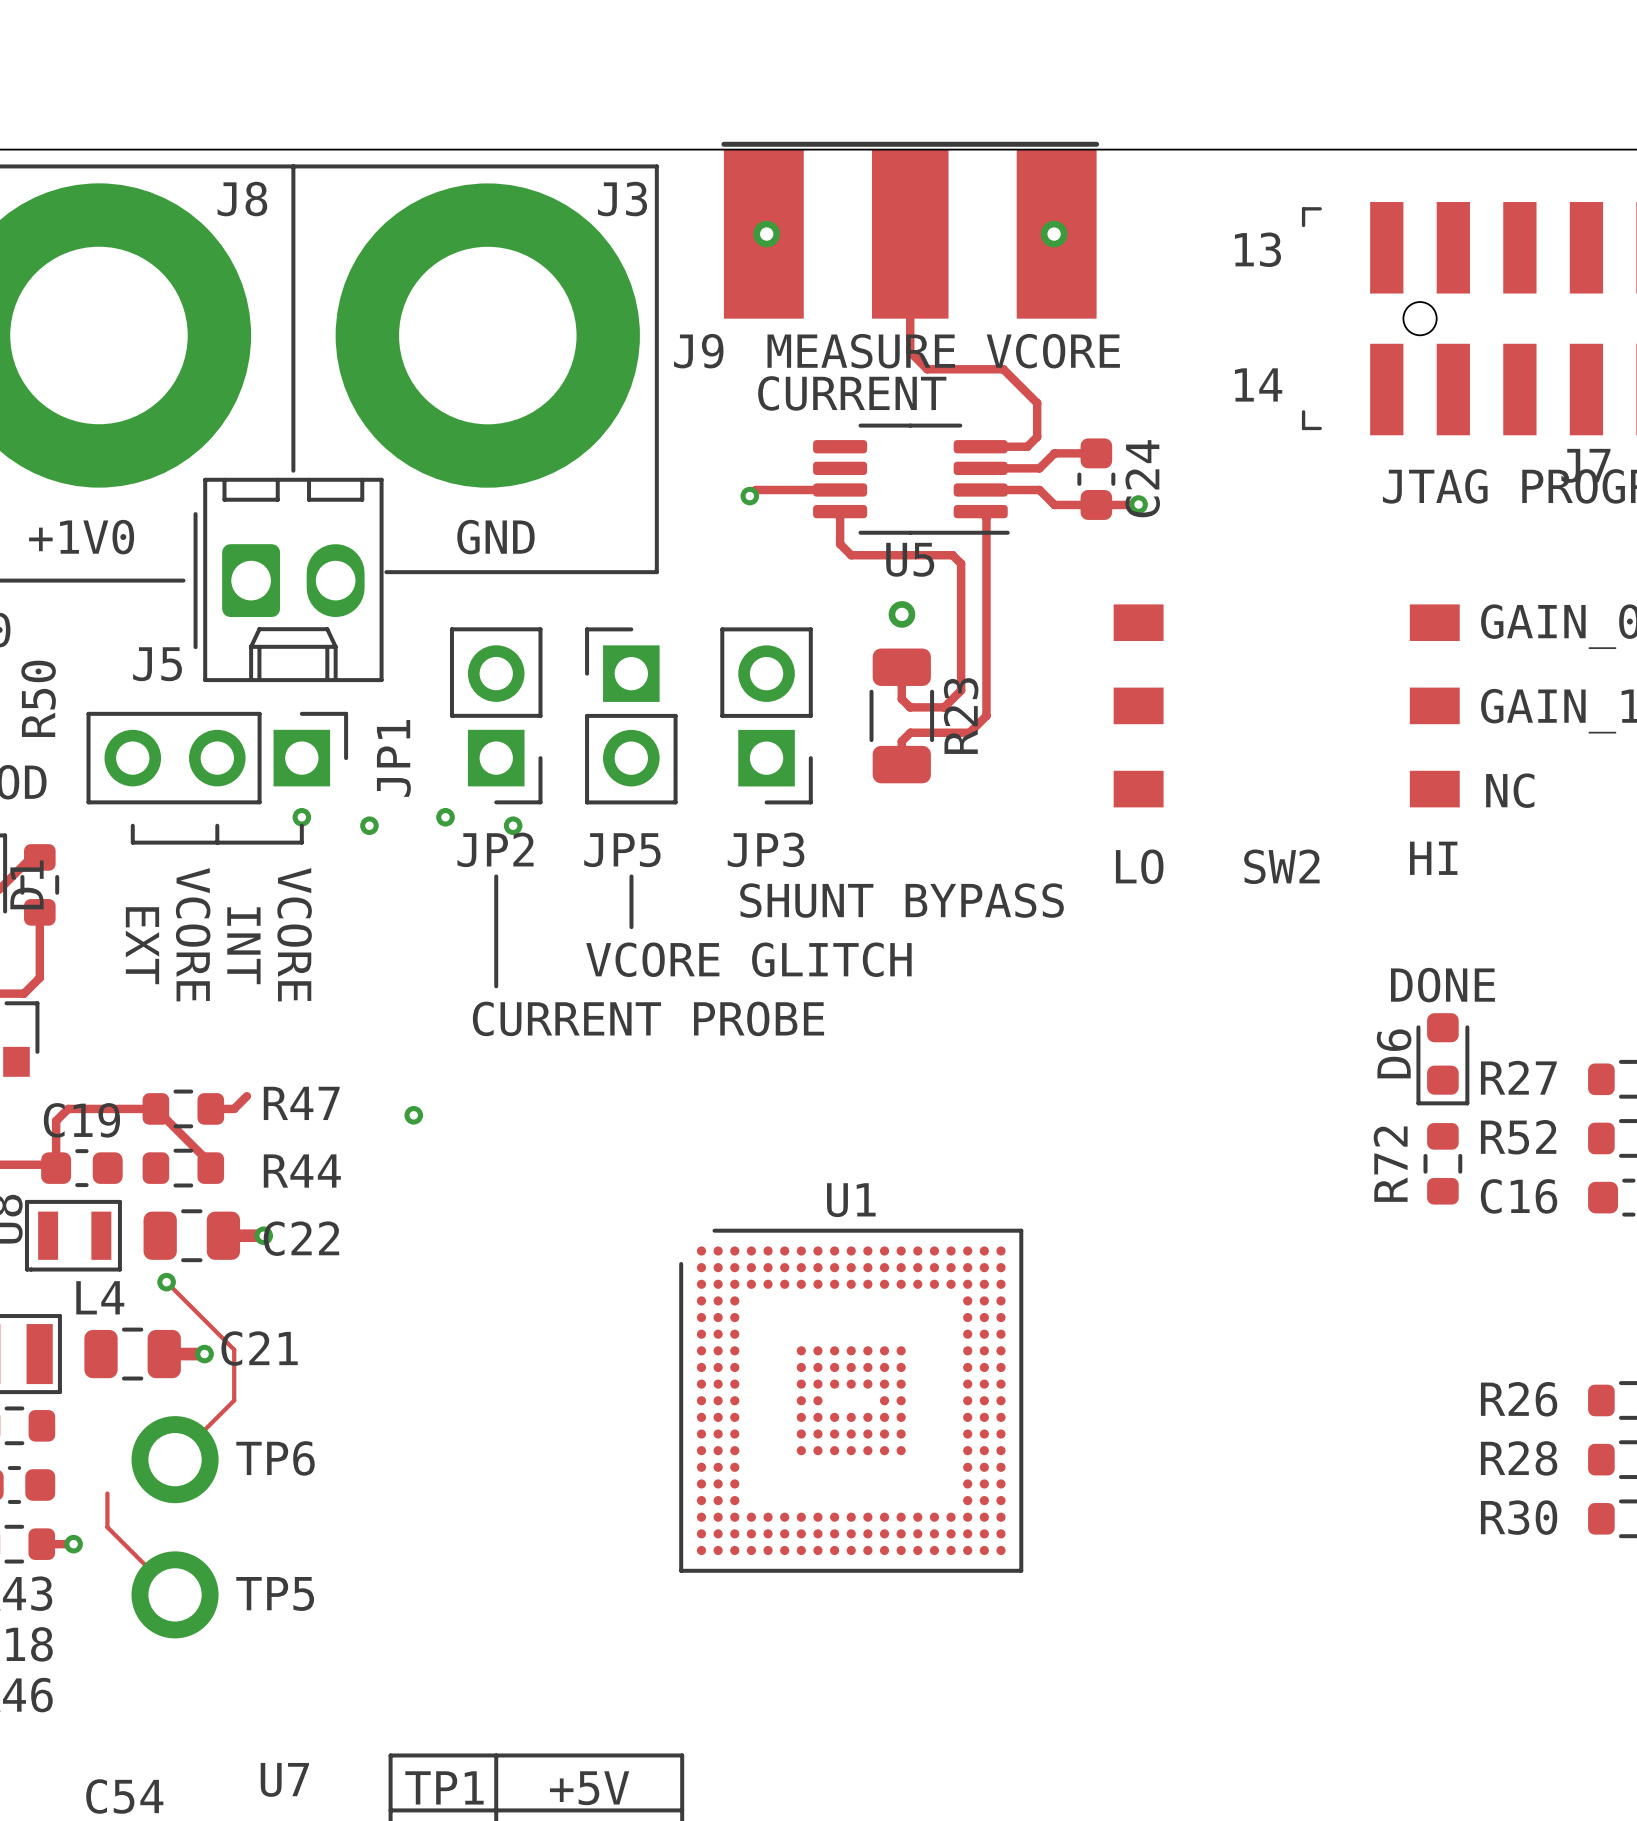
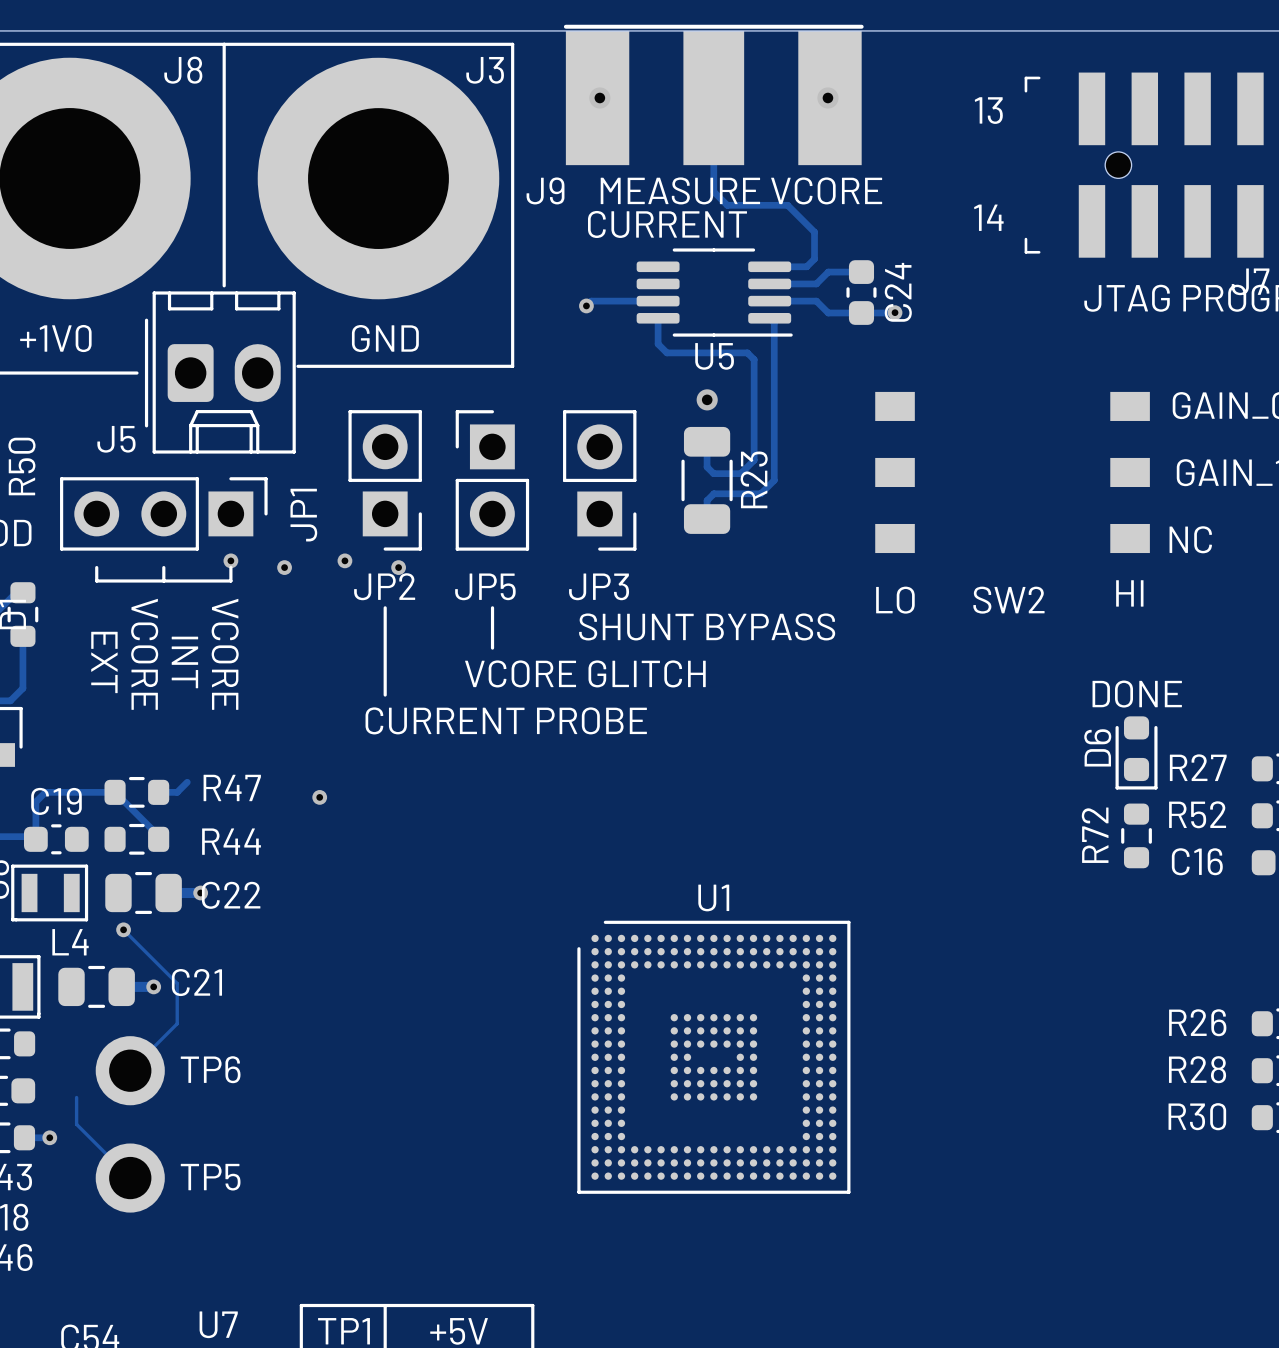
U1 position: (851, 1400) -> (713, 1057)

